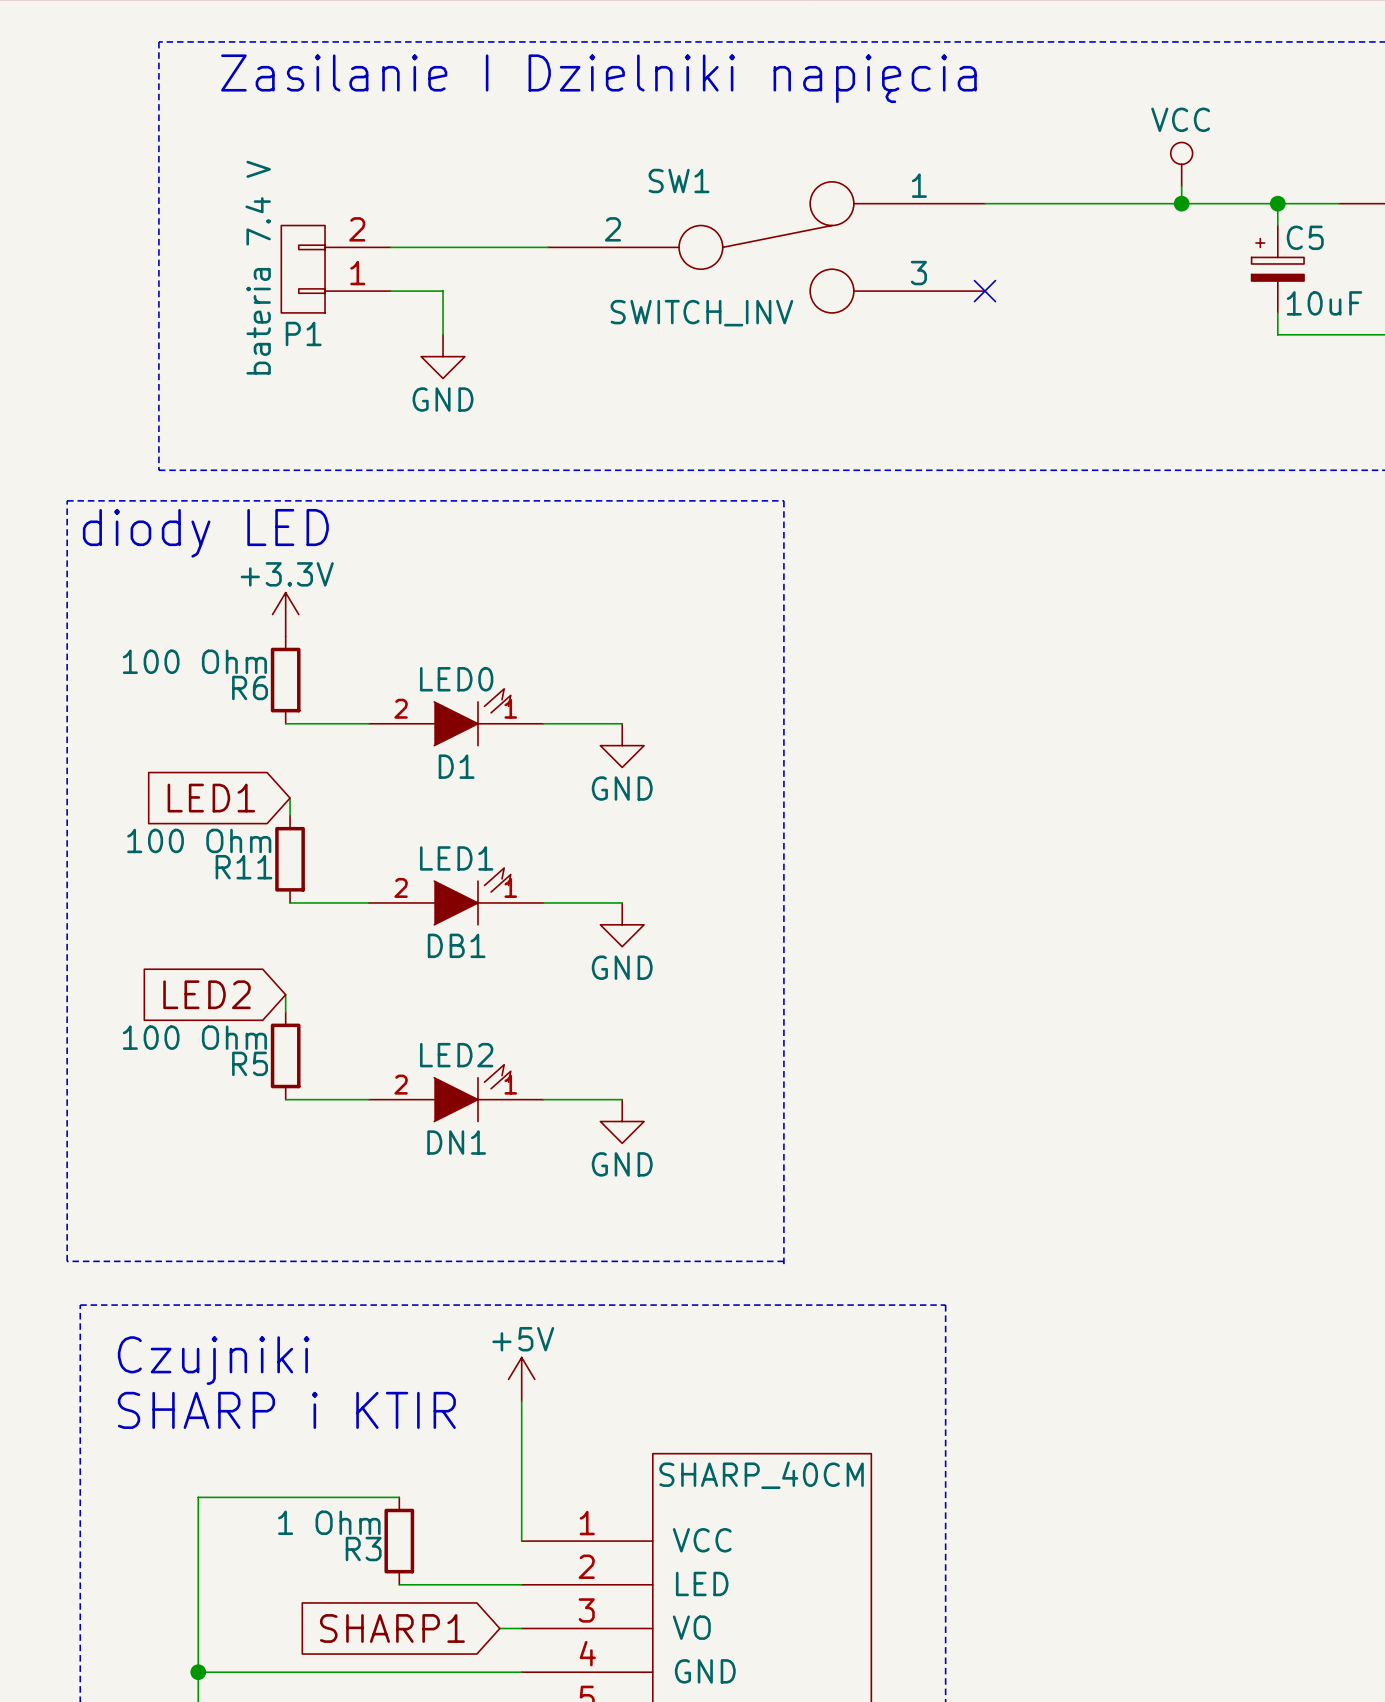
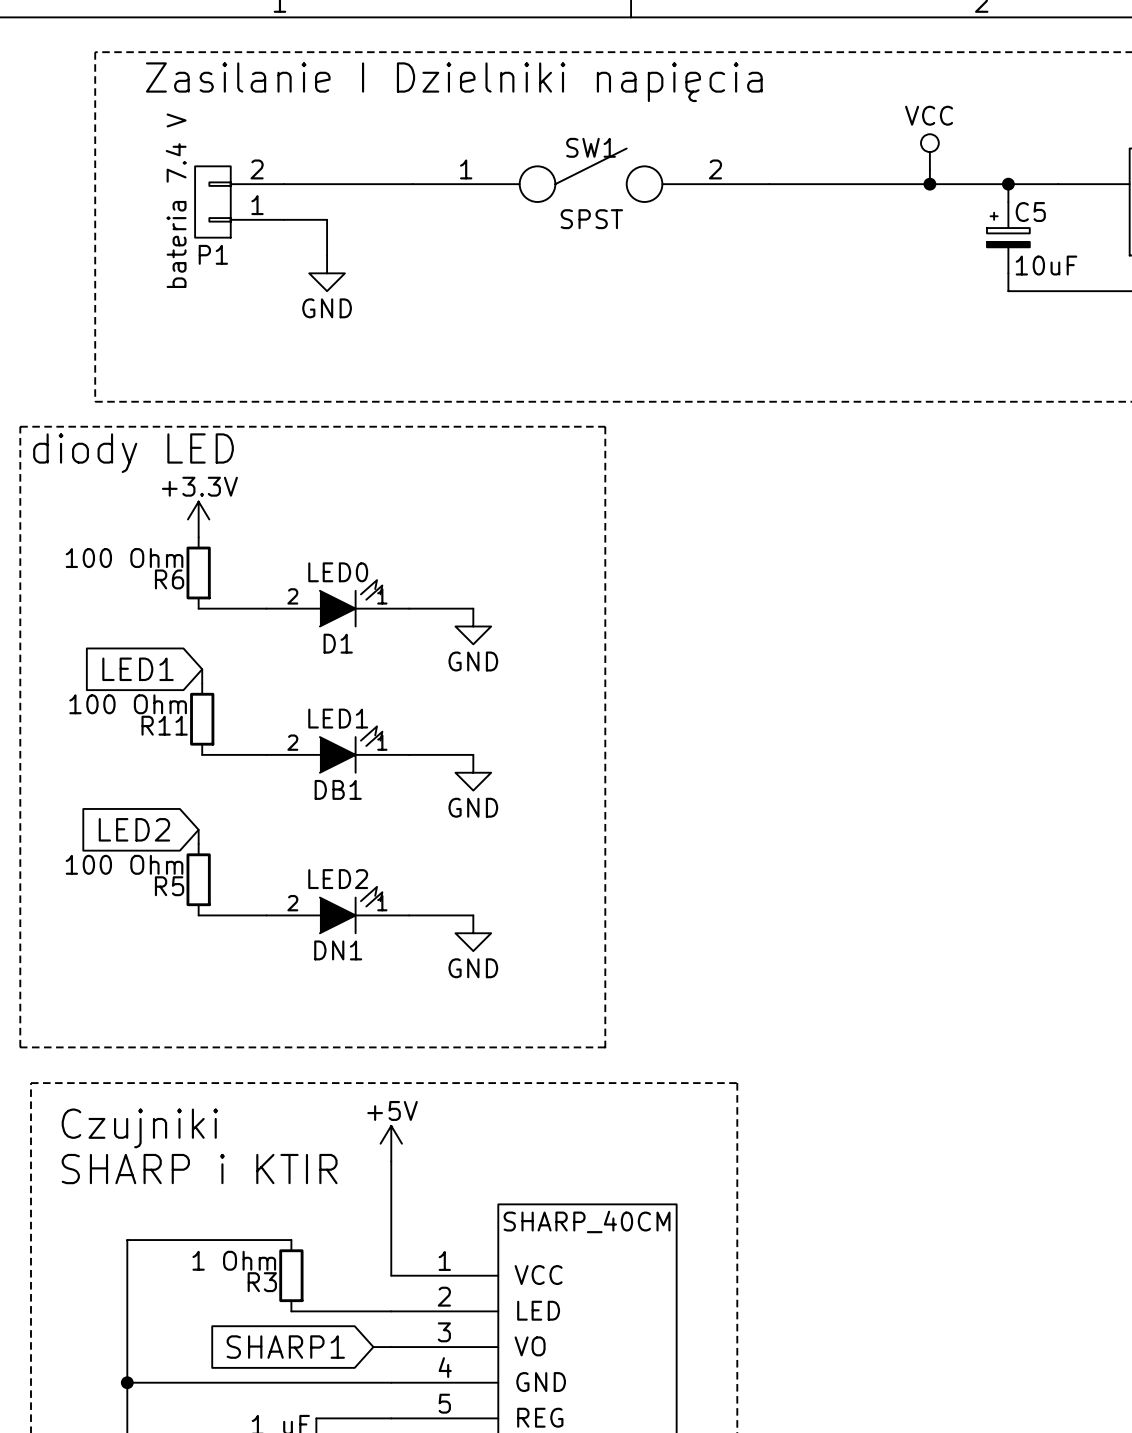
SW1 symbol: [547, 181, 985, 313] -> [412, 148, 770, 203]
SW1 name position: SW1 (679, 181) -> SW1 (591, 147)
wire: none -> (284, 184) (412, 184)
wire: (443, 247) (547, 247) -> (327, 219) (327, 255)
P1 position: (335, 269) -> (239, 202)
wire: (390, 291) (443, 291) (443, 334) -> none
no-connect mark: (984, 291) -> none
SW1 value: SWITCH_INV (701, 313) -> SPST (591, 219)
power symbol position: GND (443, 356) -> GND (327, 273)

